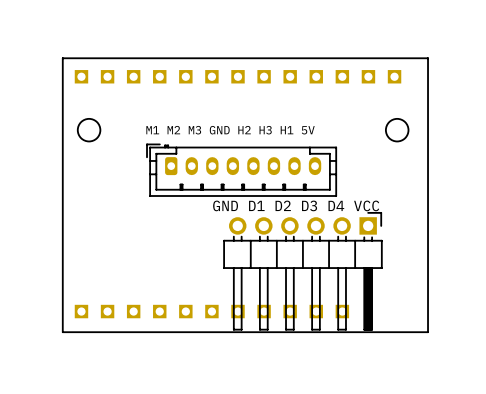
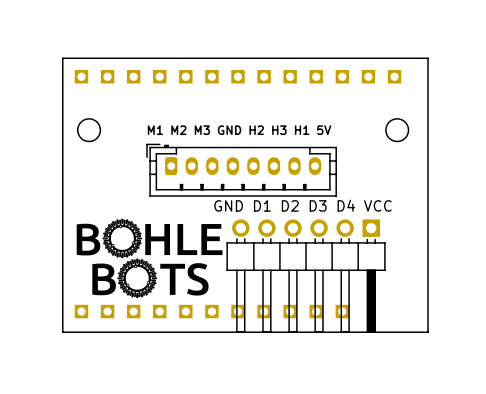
part footprint: [223, 212, 383, 331] -> [226, 219, 386, 333]
drawing: none -> [76, 218, 223, 299]

